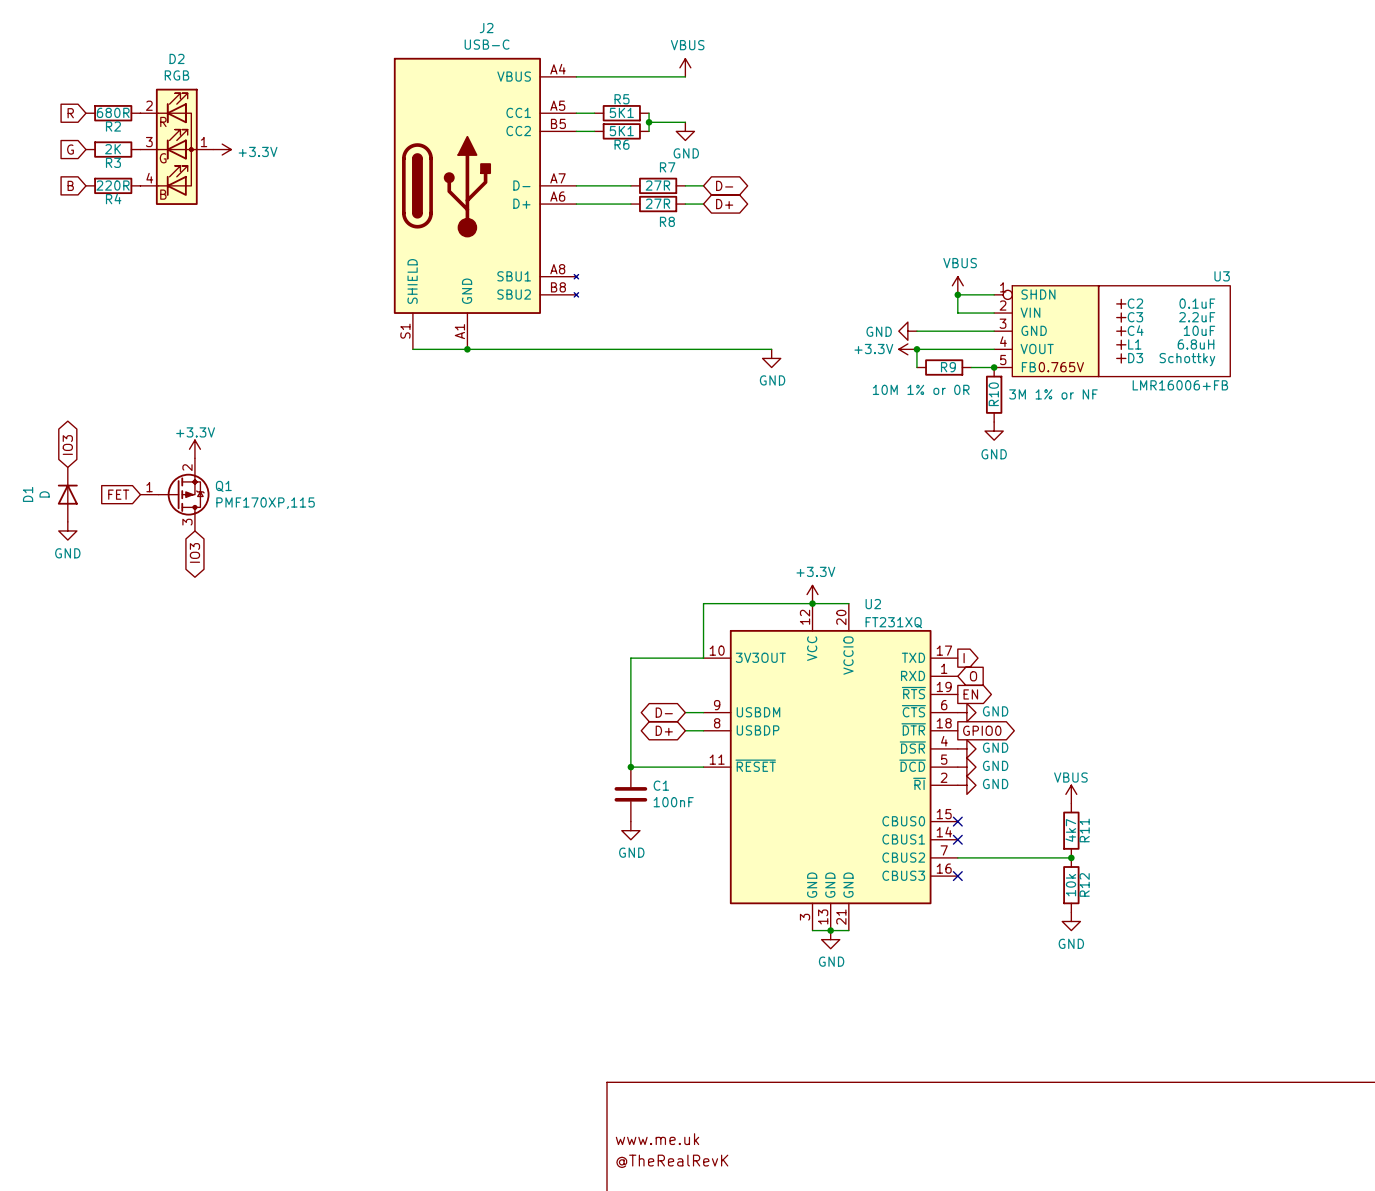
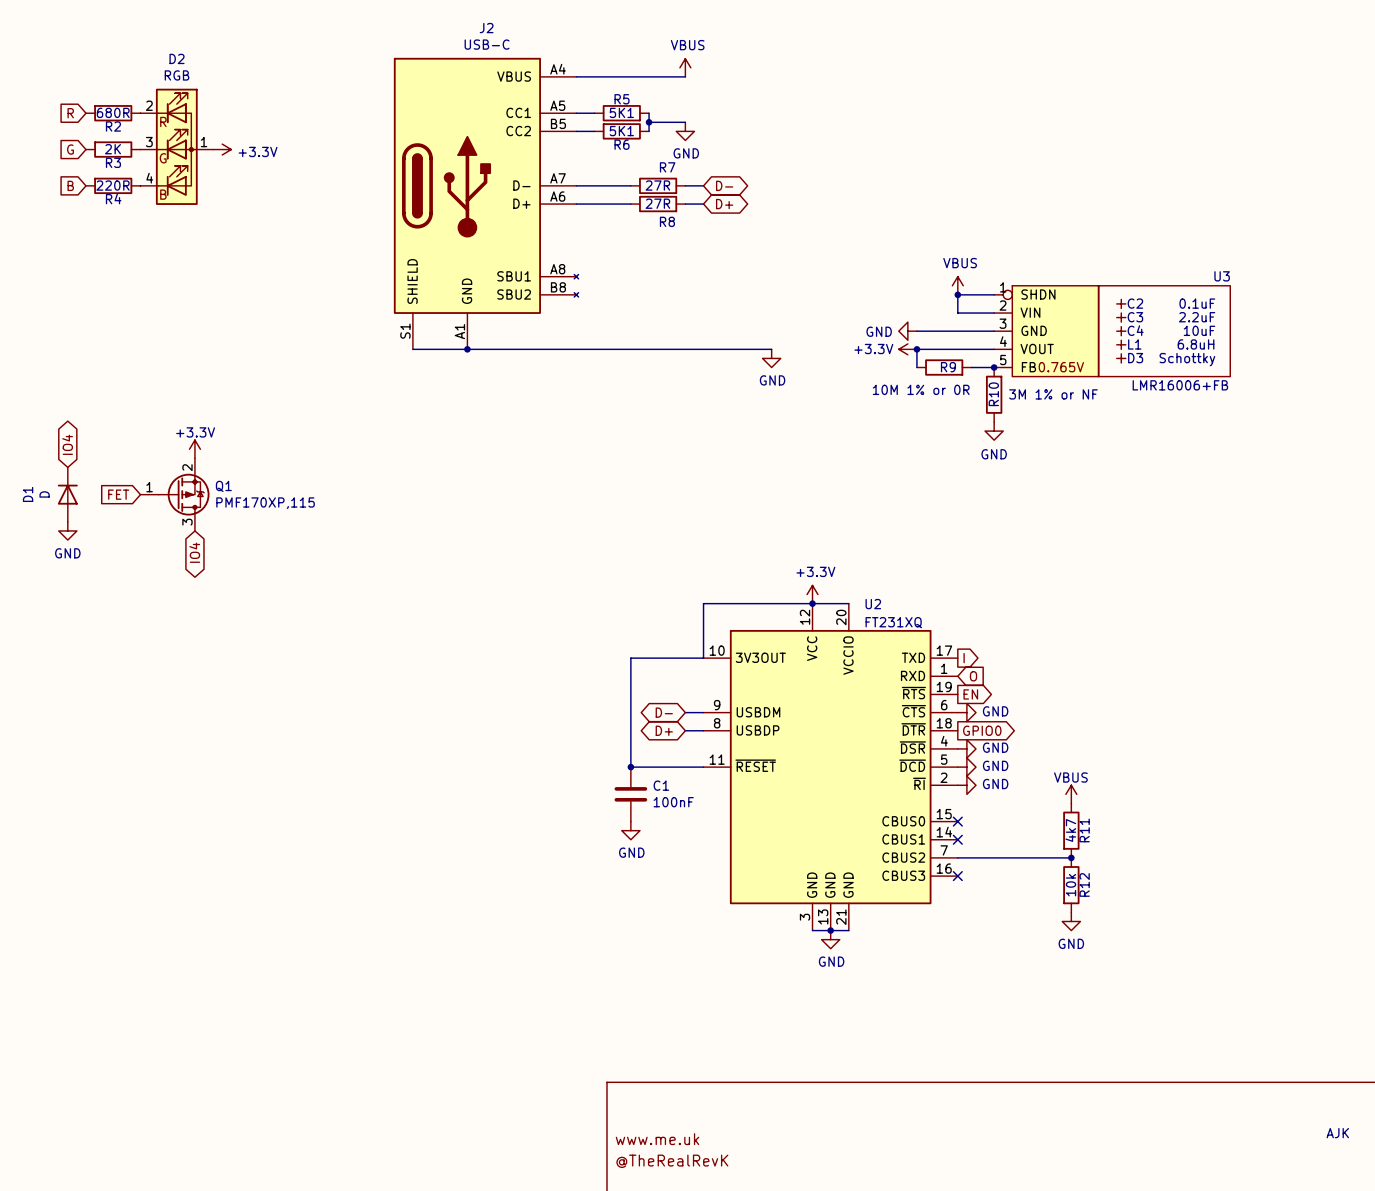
global label: IO3 (67, 445) -> IO4 (67, 444)
global label: IO3 (194, 552) -> IO4 (194, 552)
part: none -> AJK (1337, 1133)

